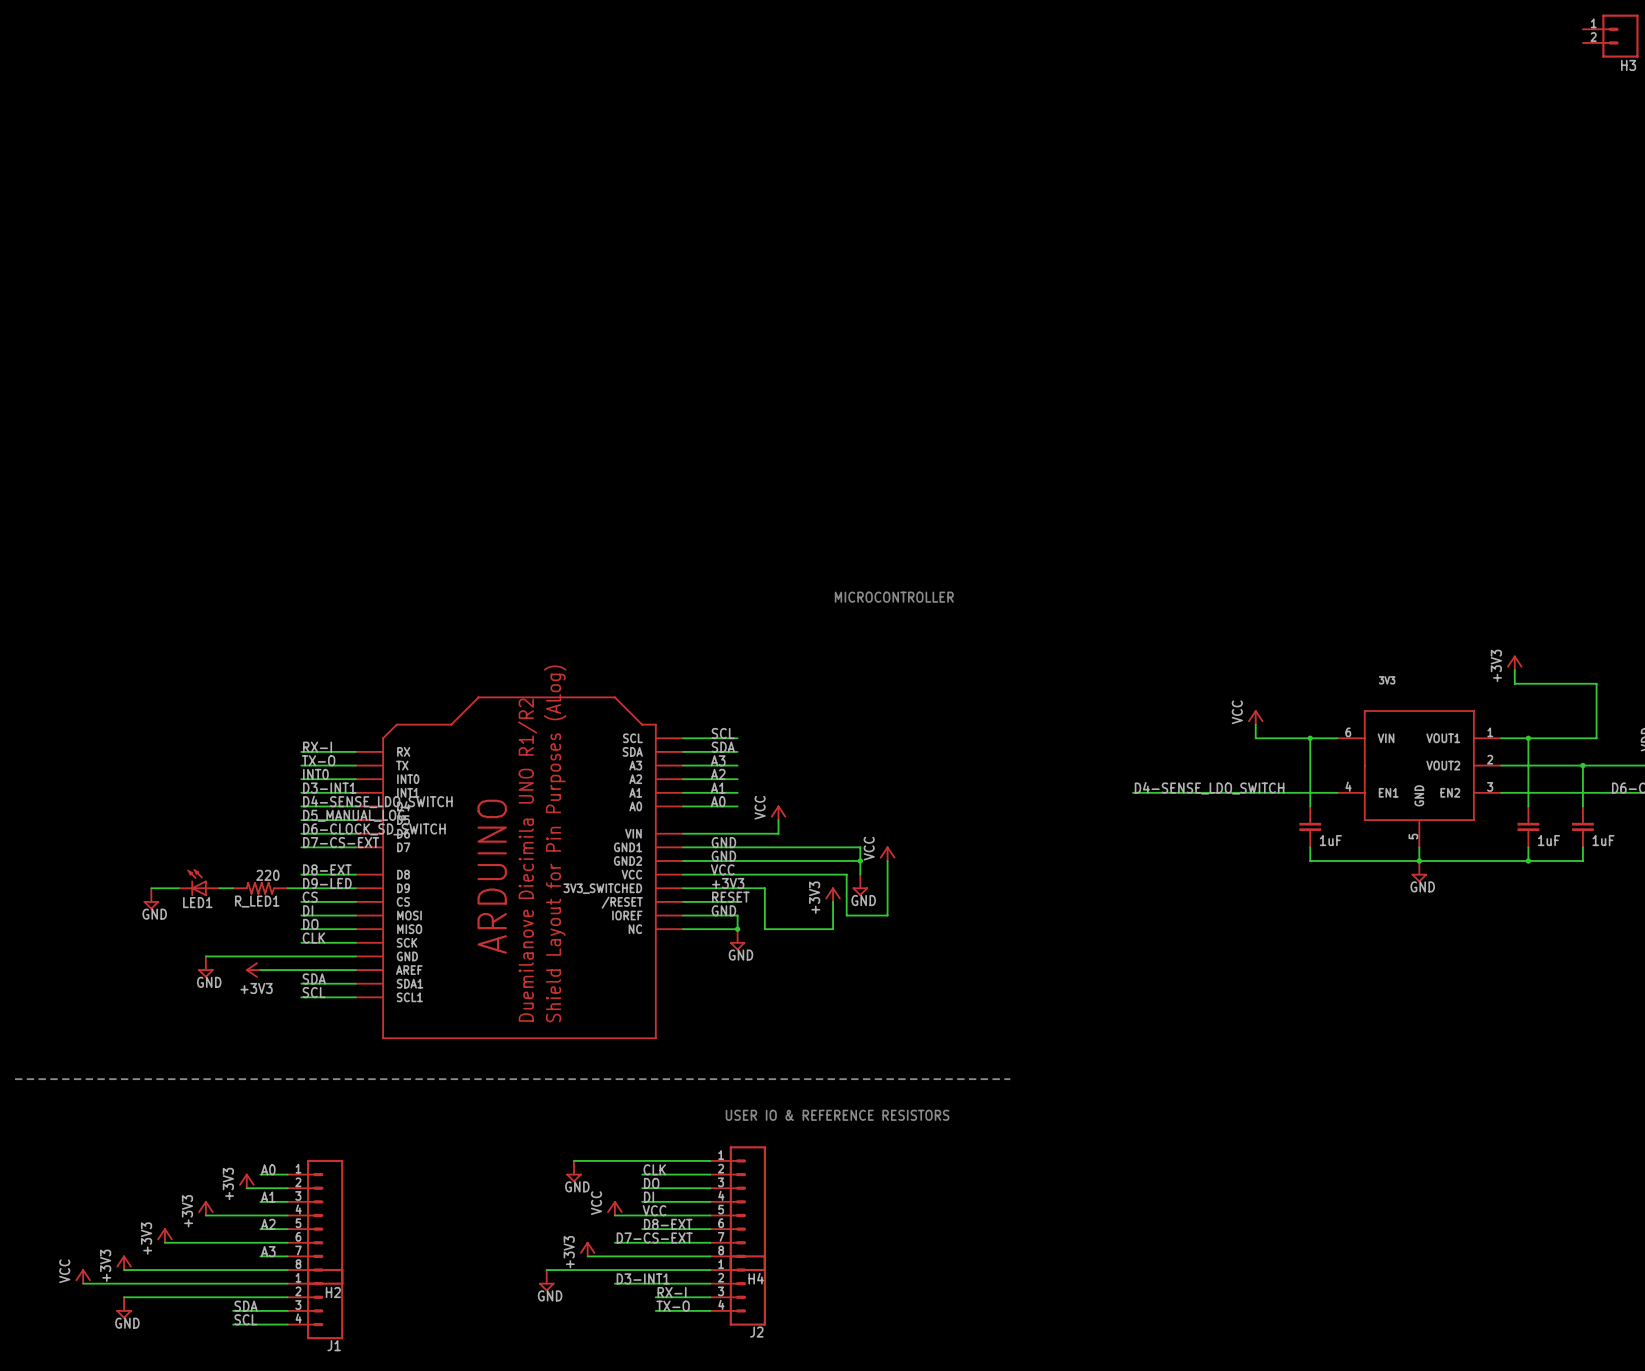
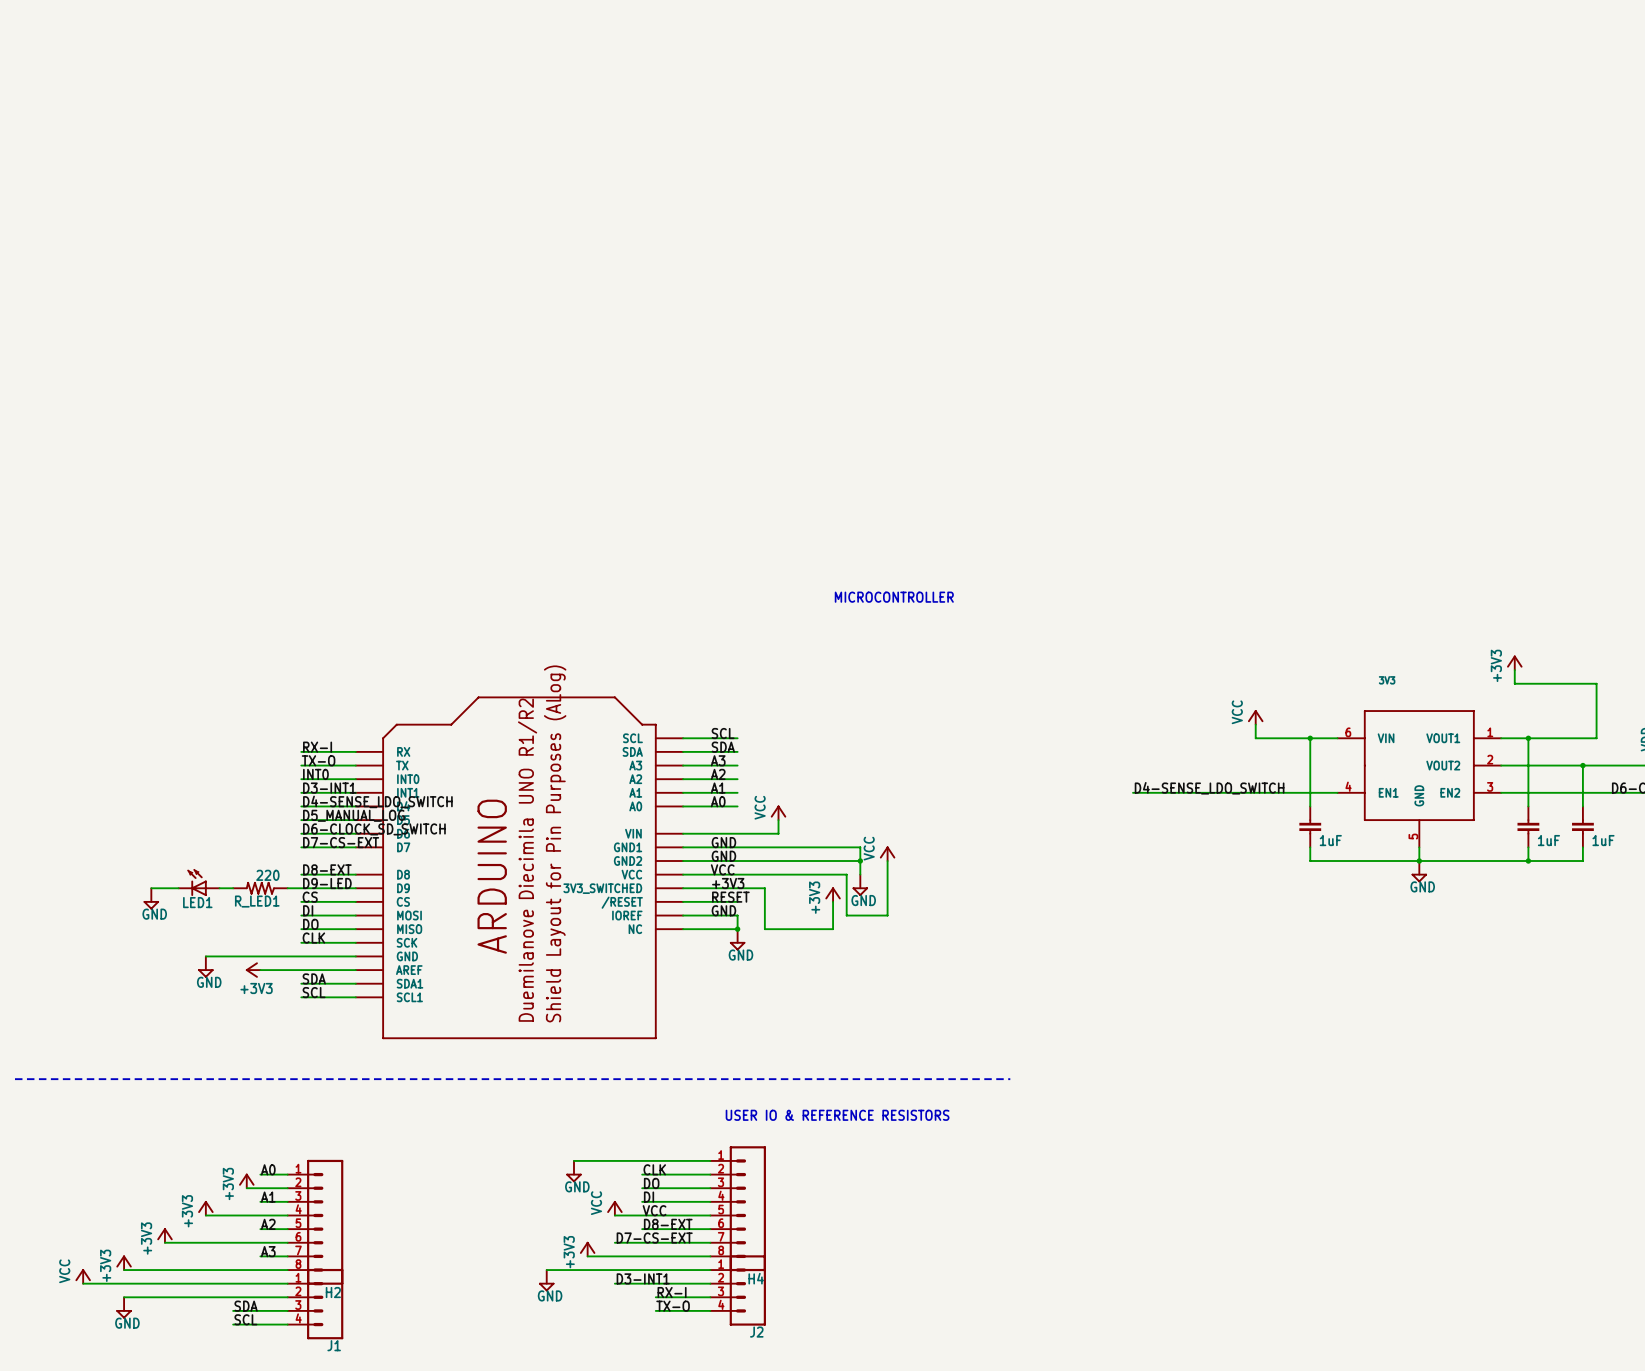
H3: (1610, 36) -> none

